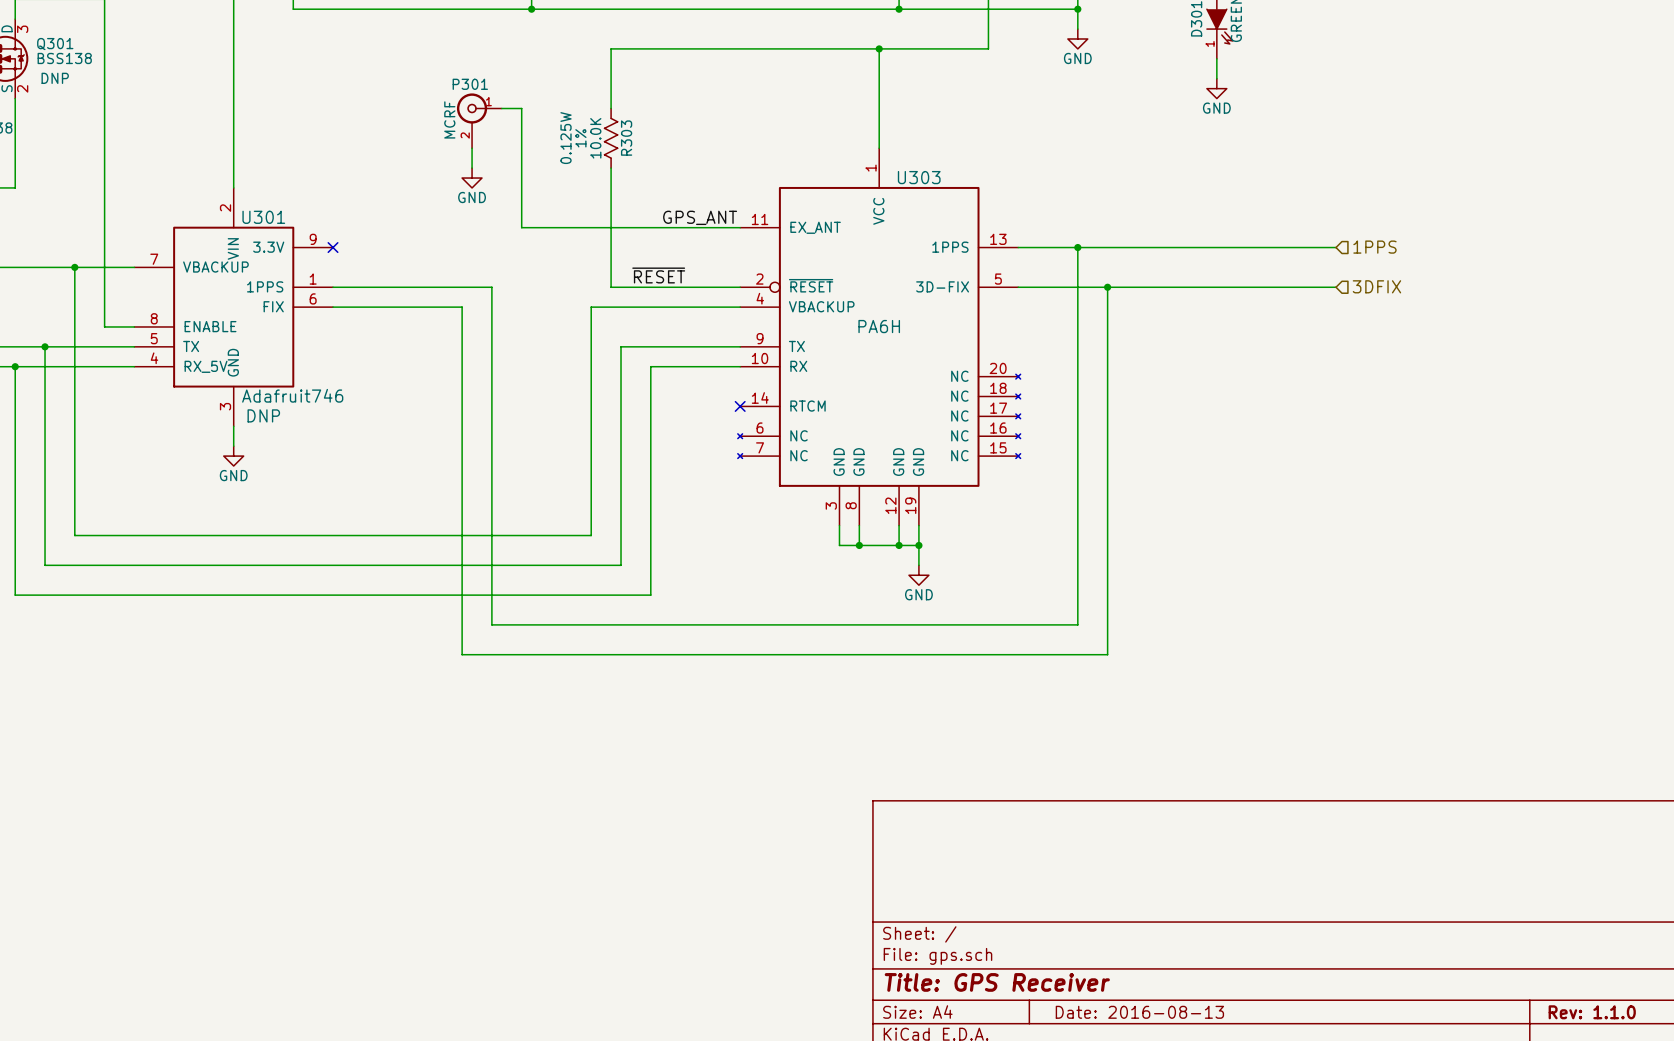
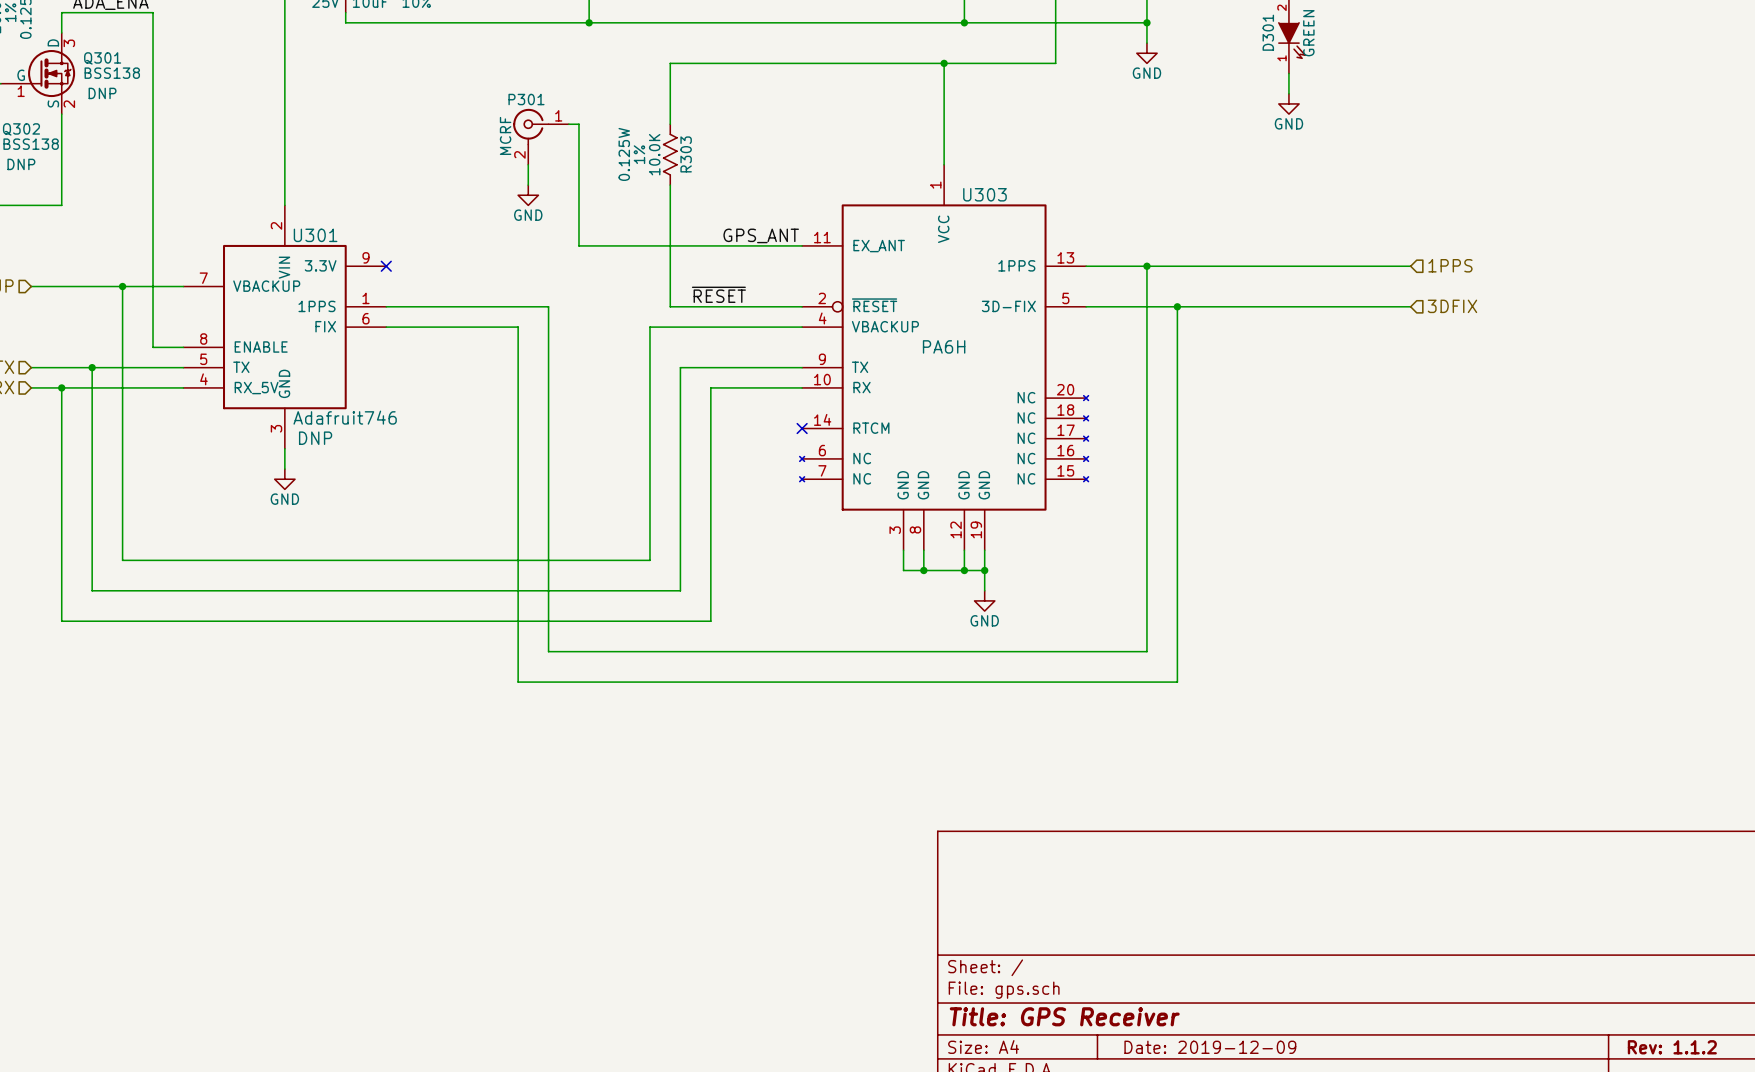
P301 symbol: [456, 93, 502, 149] -> [513, 108, 569, 165]
title block: Date: 2016-08-13 (1139, 1012) -> Date: 2019-12-09 (1210, 1047)
title block: Rev: 1.1.0 (1592, 1012) -> Rev: 1.1.2 (1672, 1047)

